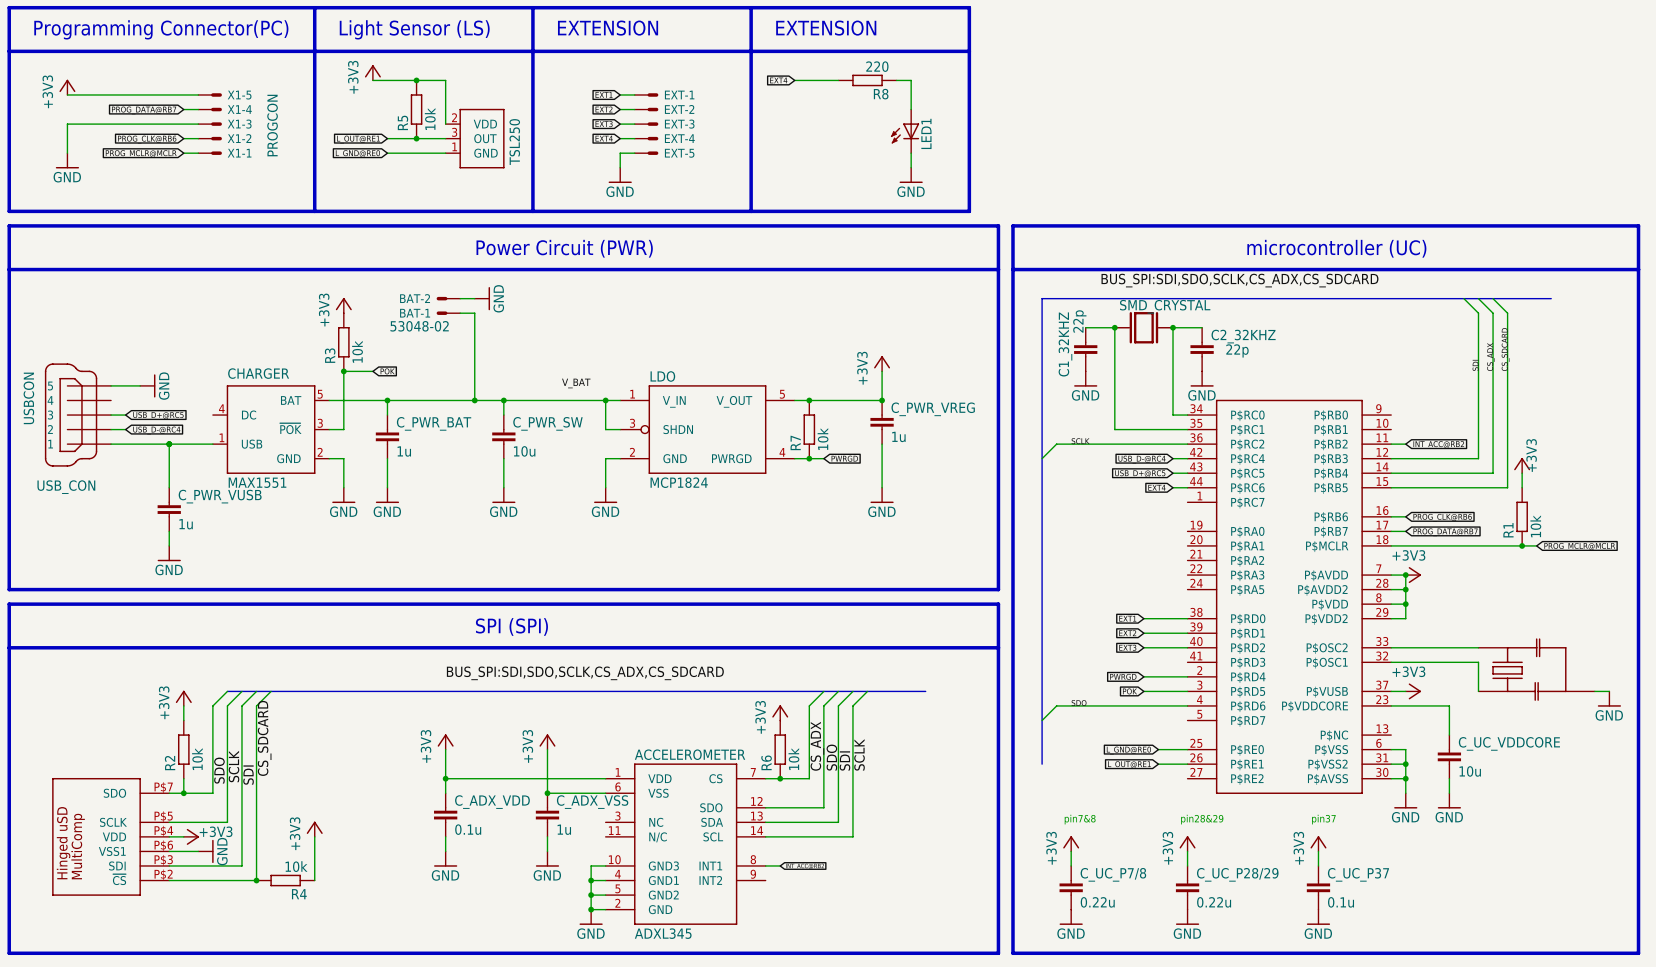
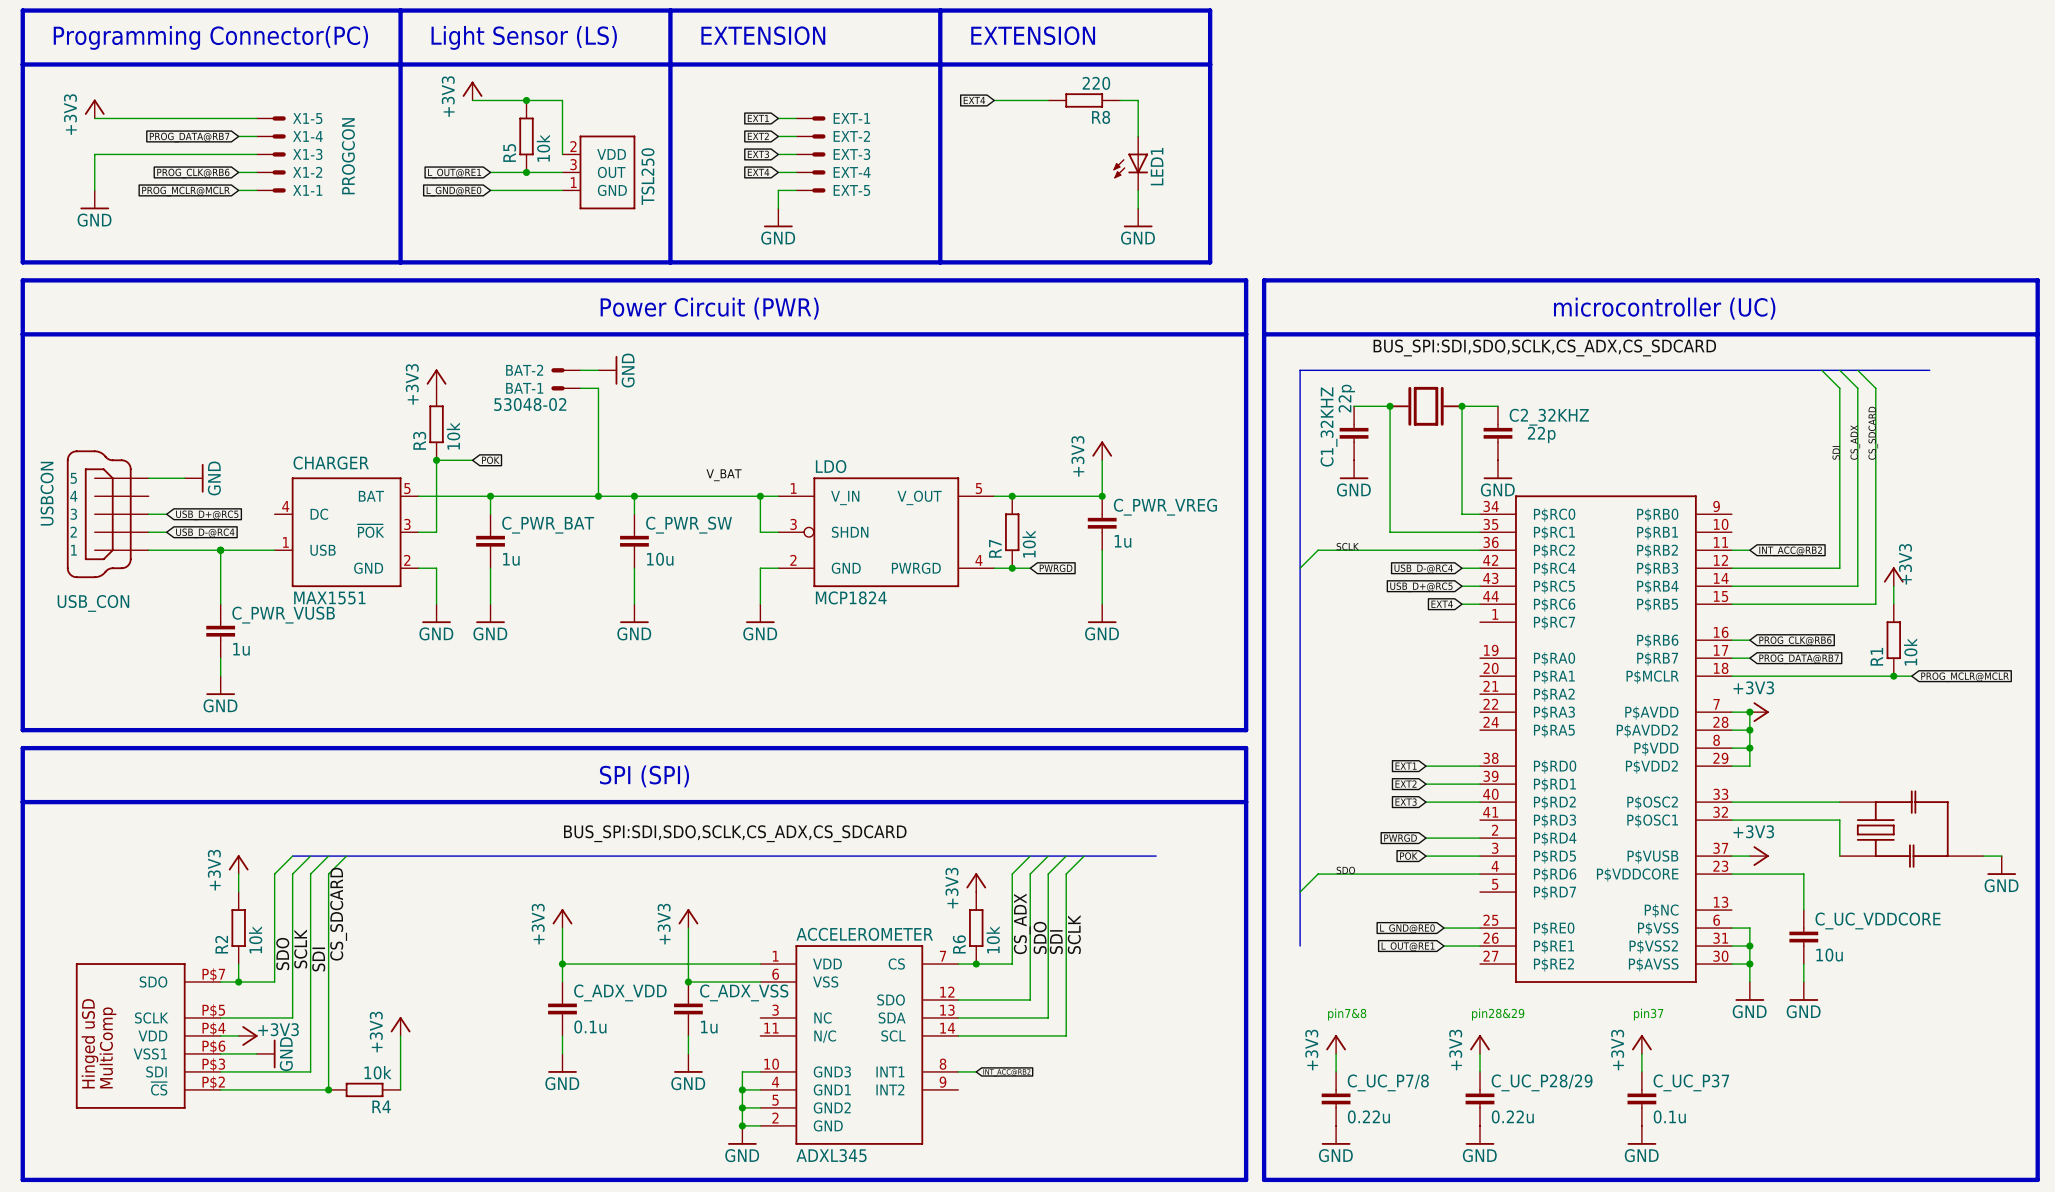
part value: SMD_CRYSTAL (1165, 306) -> none

